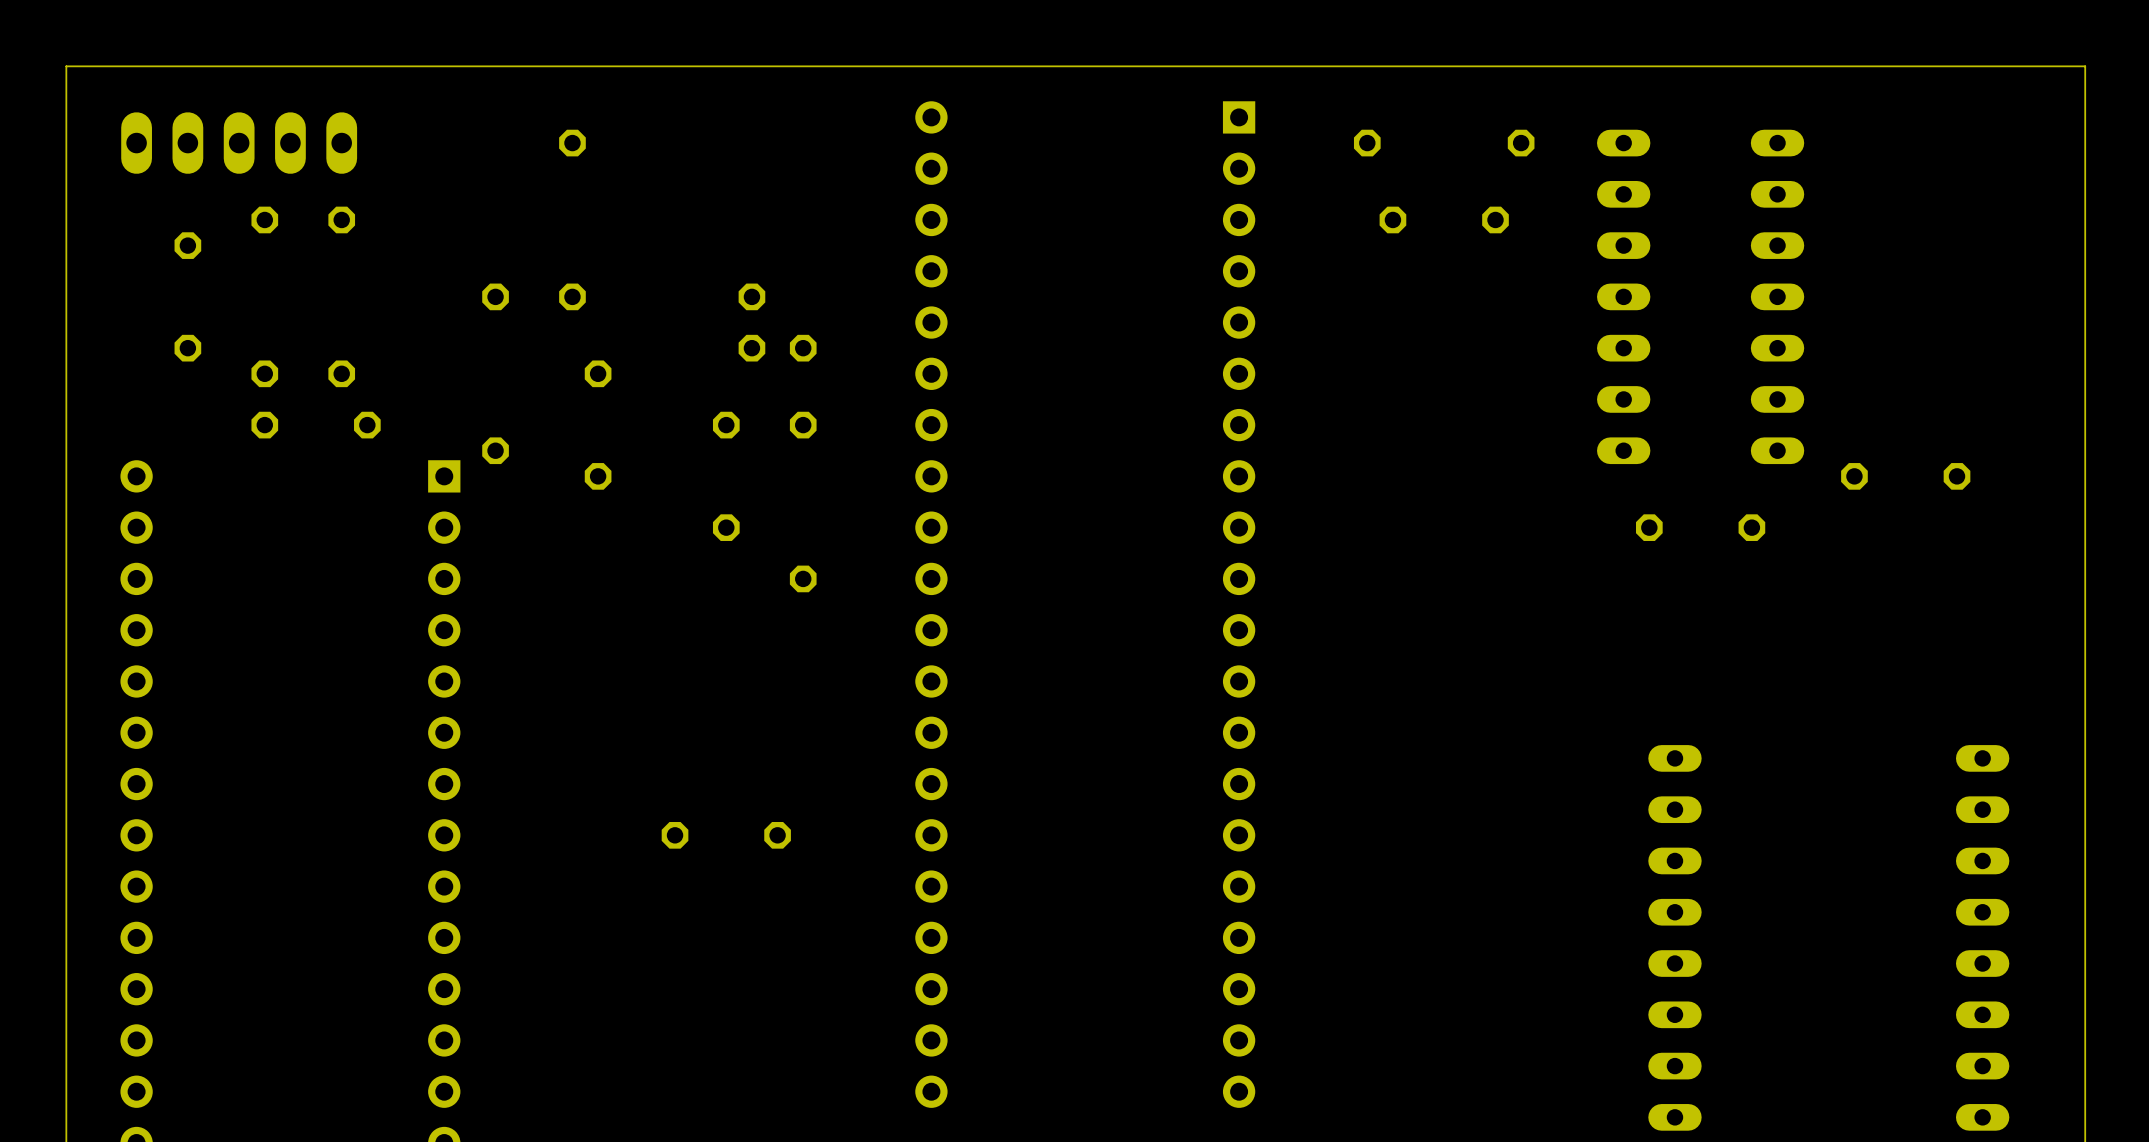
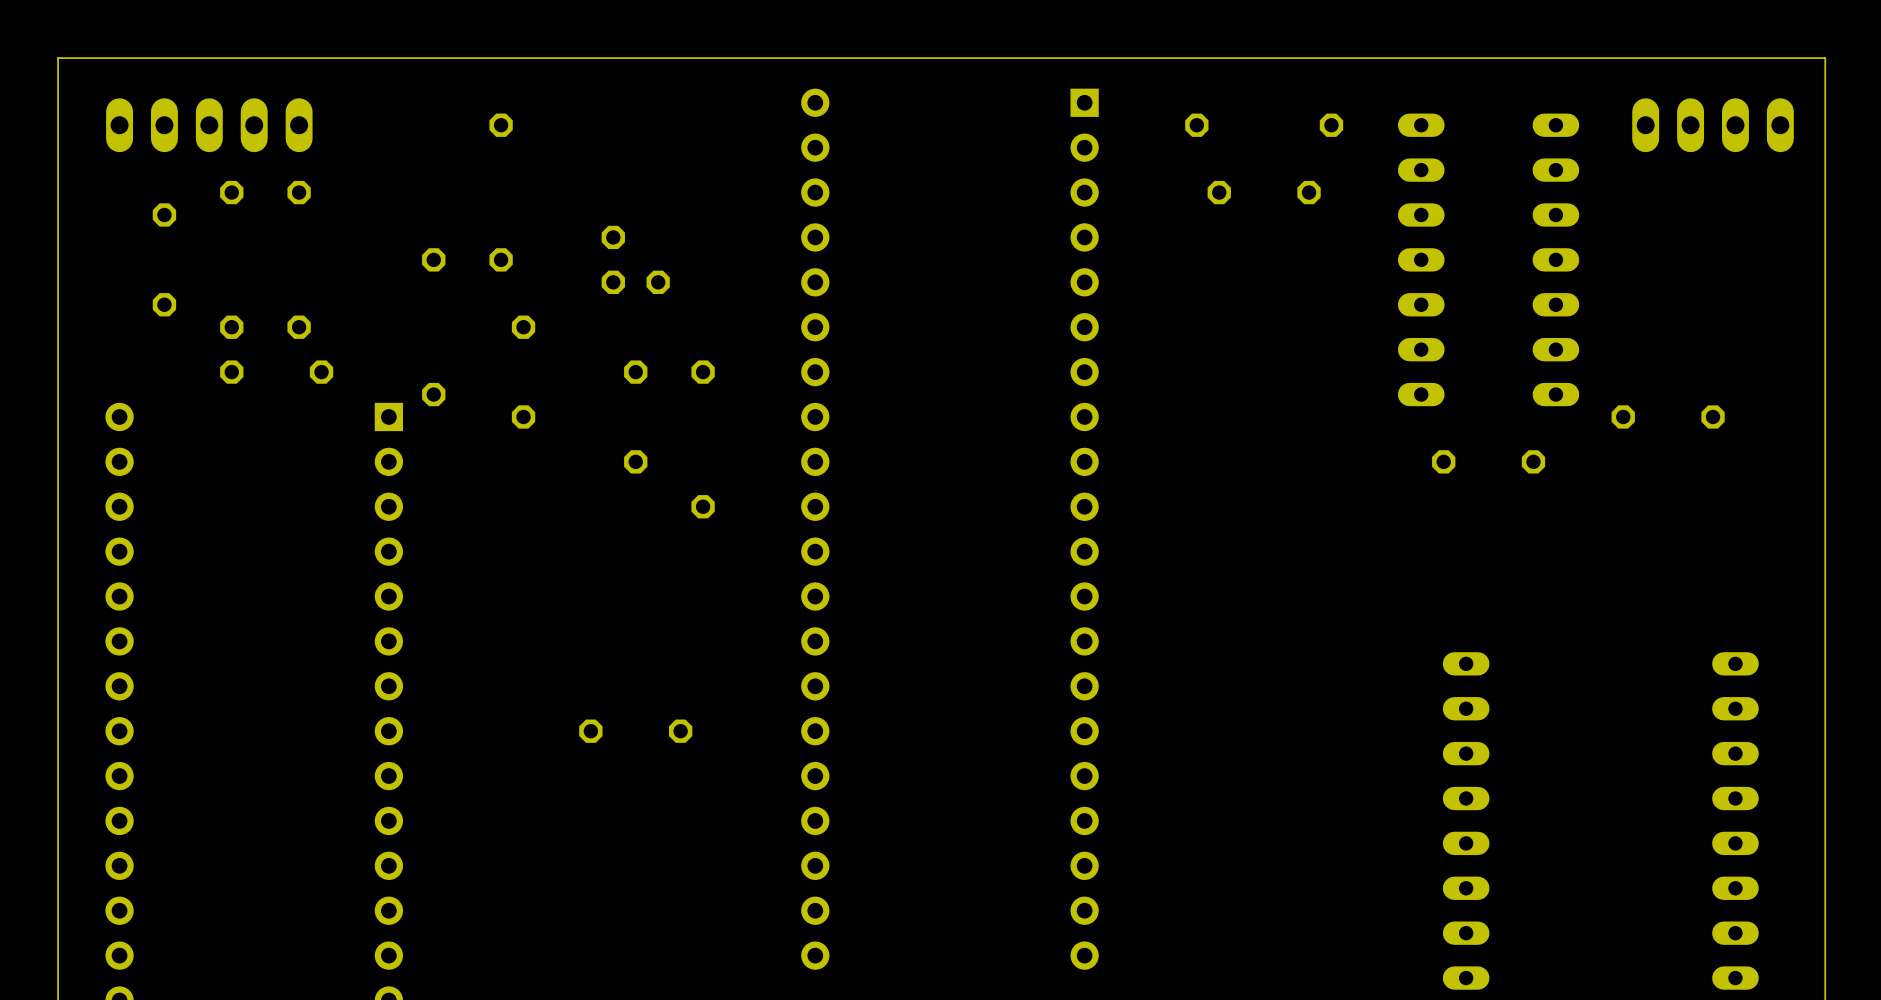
part: none -> (1713, 125)
part position: (777, 322) -> (635, 259)

